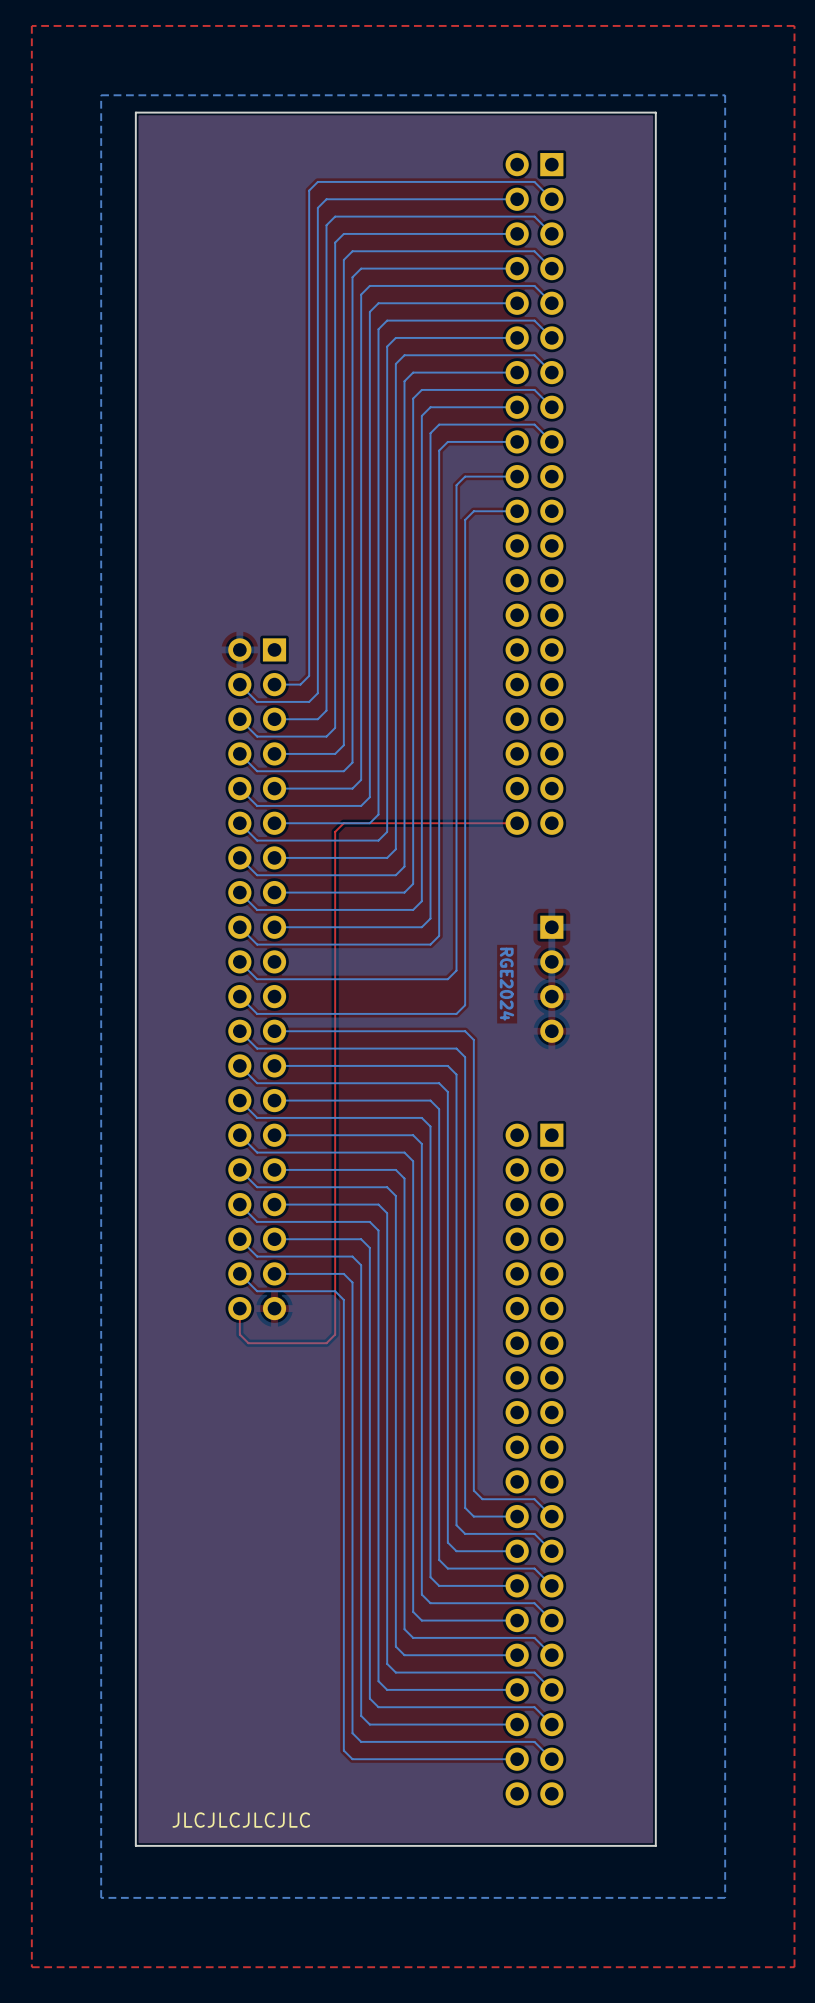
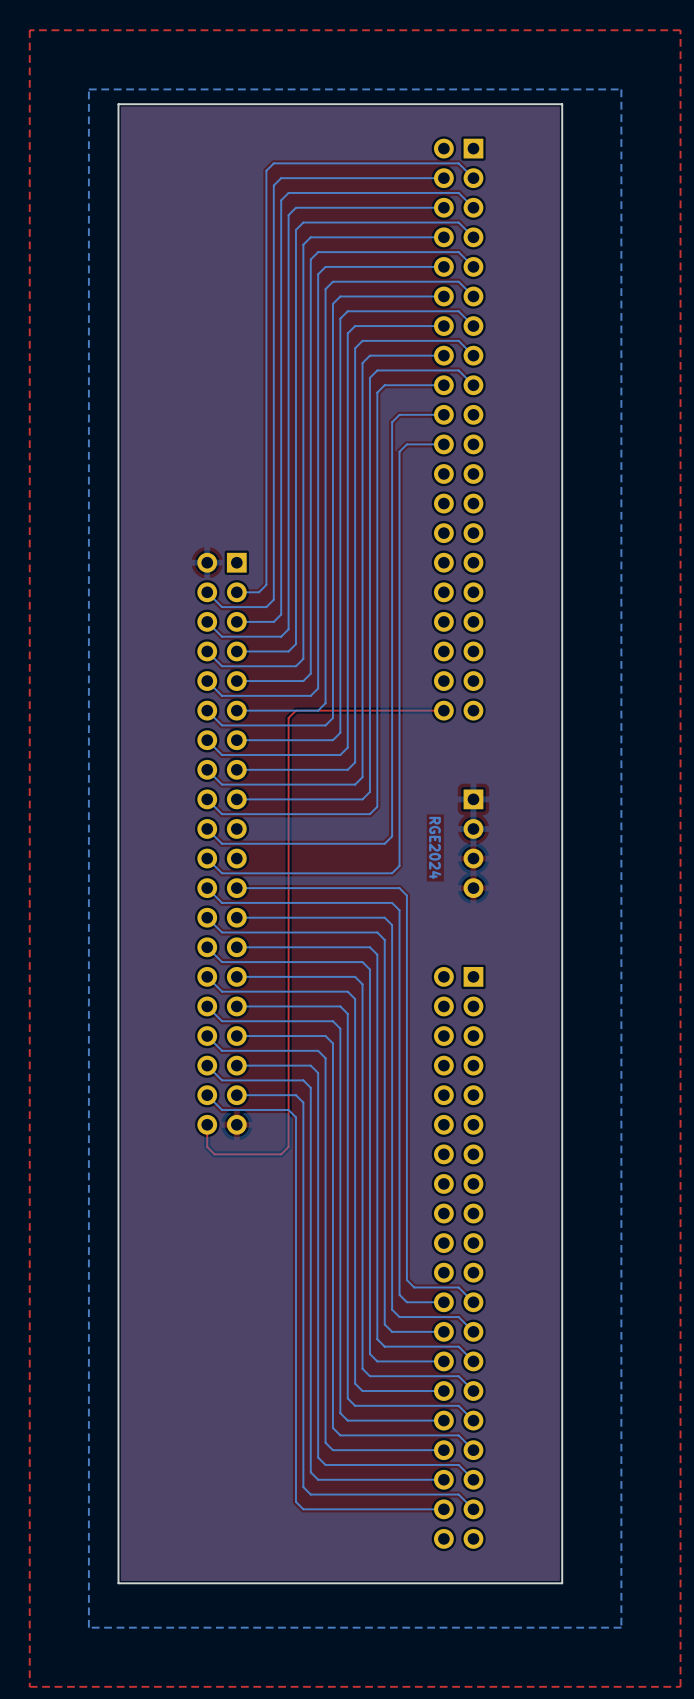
text: JLCJLCJLCJLC (241, 1820) -> none

